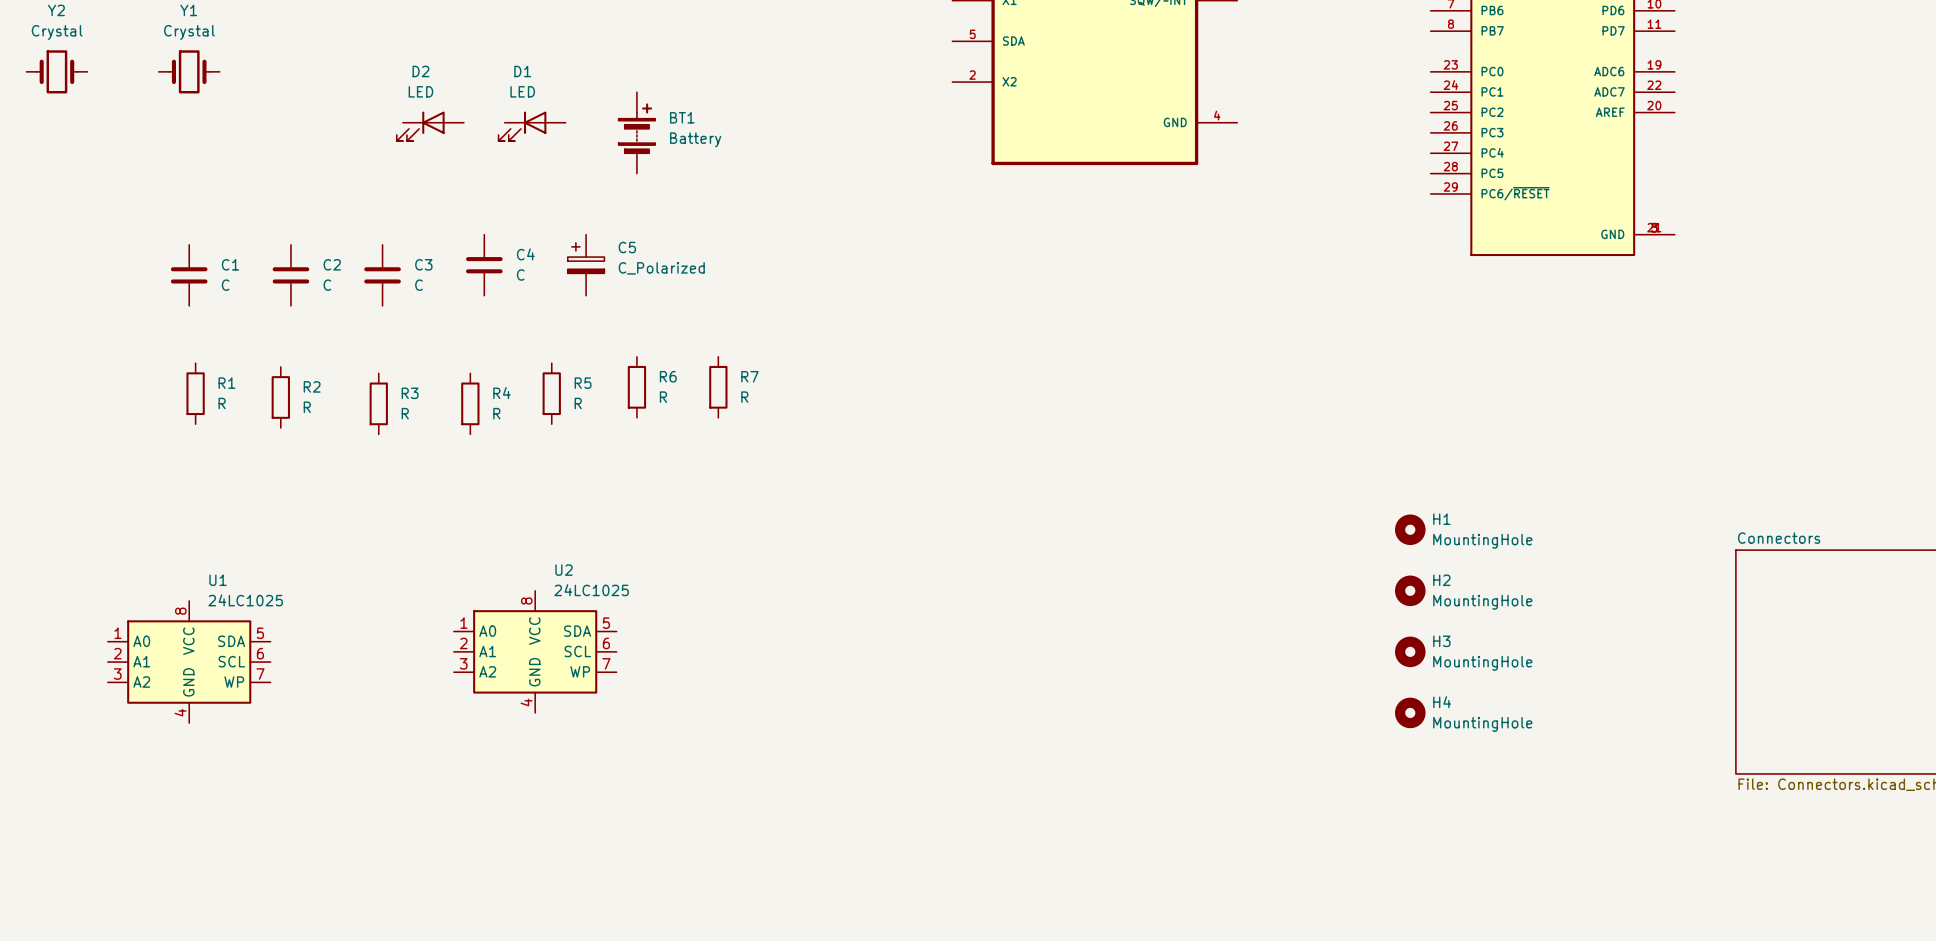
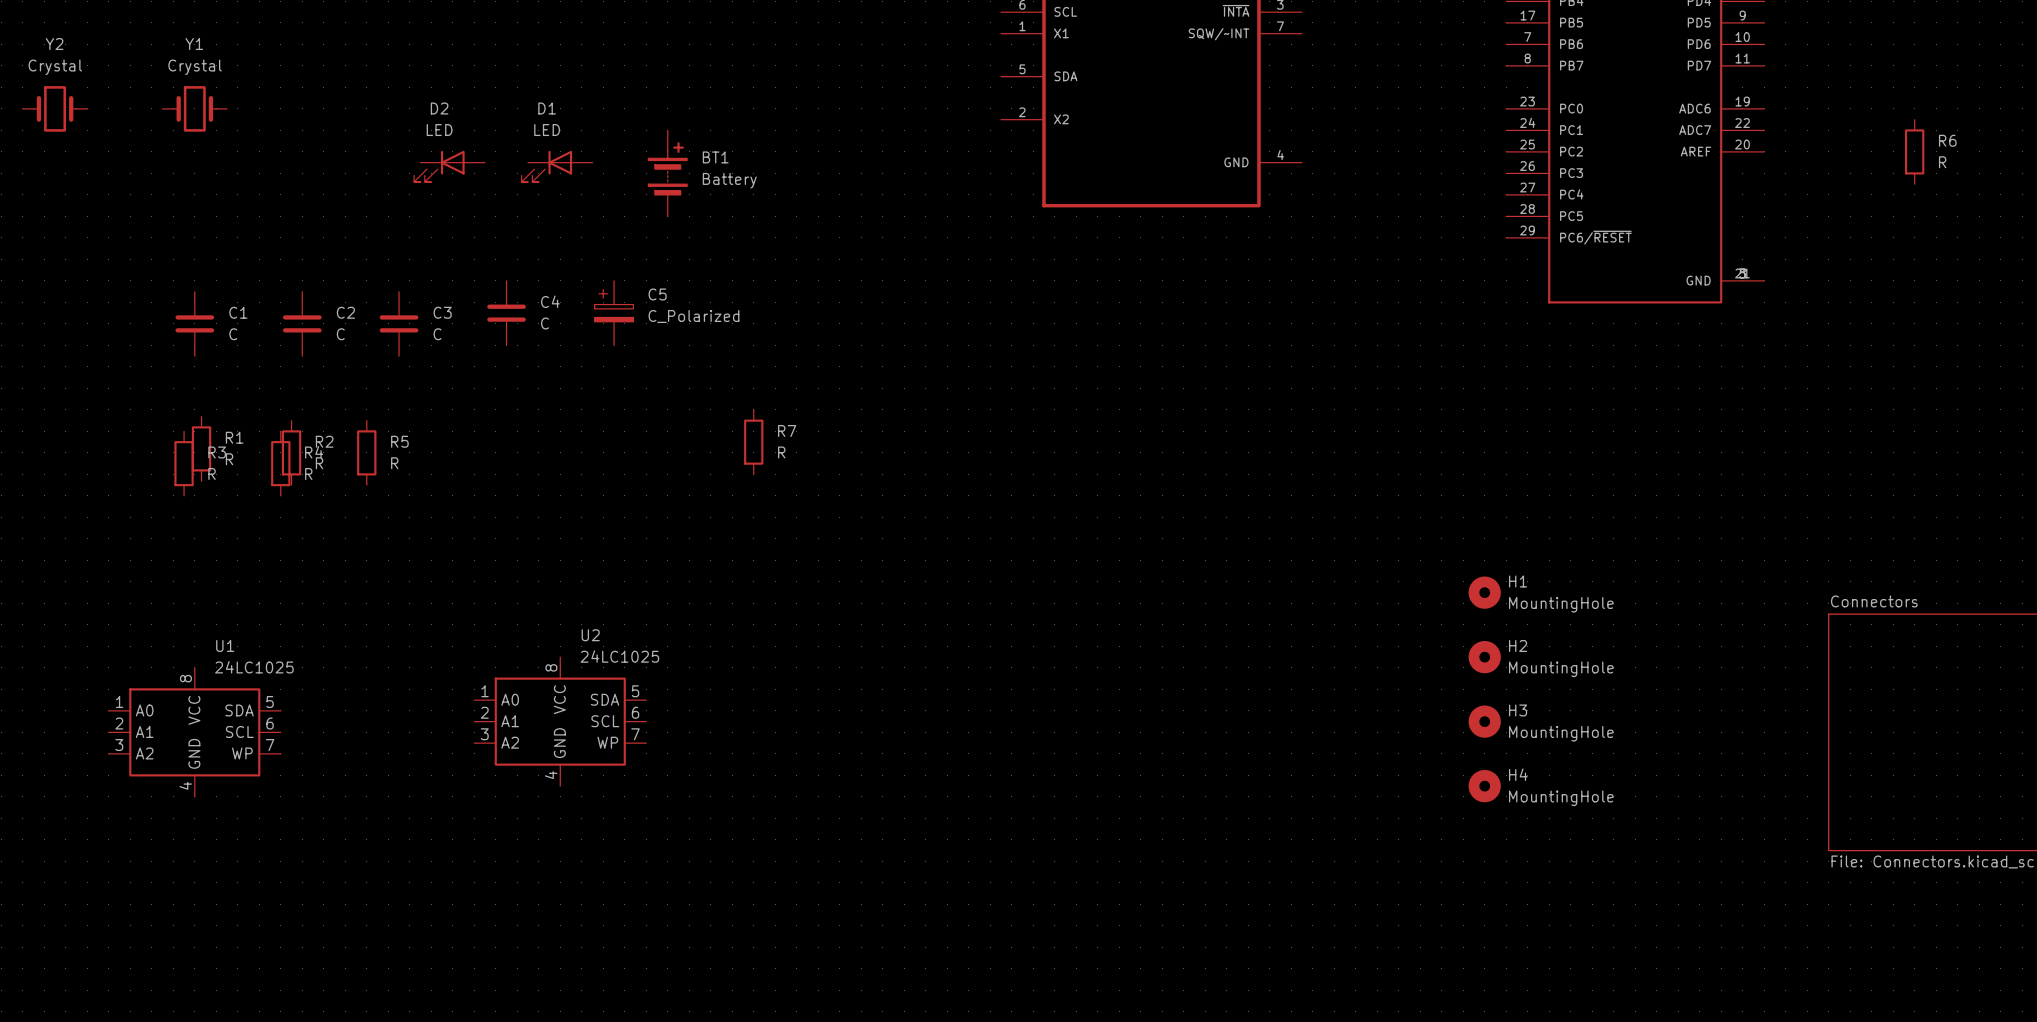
R6 position: (636, 387) -> (1914, 151)
R5 position: (551, 393) -> (366, 452)
R3 position: (378, 403) -> (184, 463)
R4 position: (470, 403) -> (280, 463)

